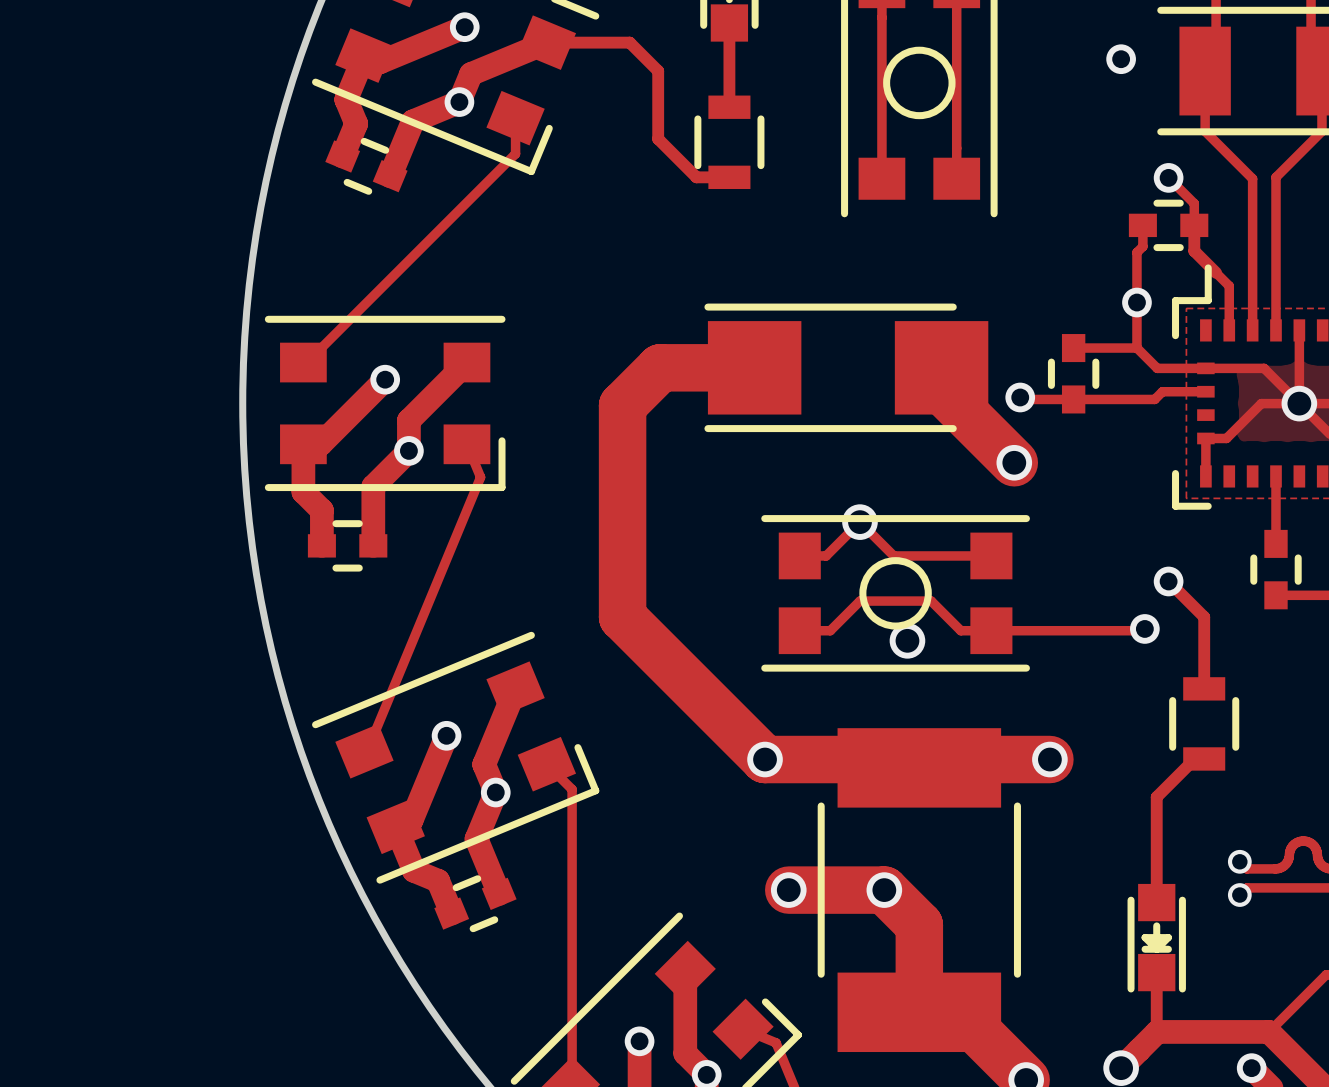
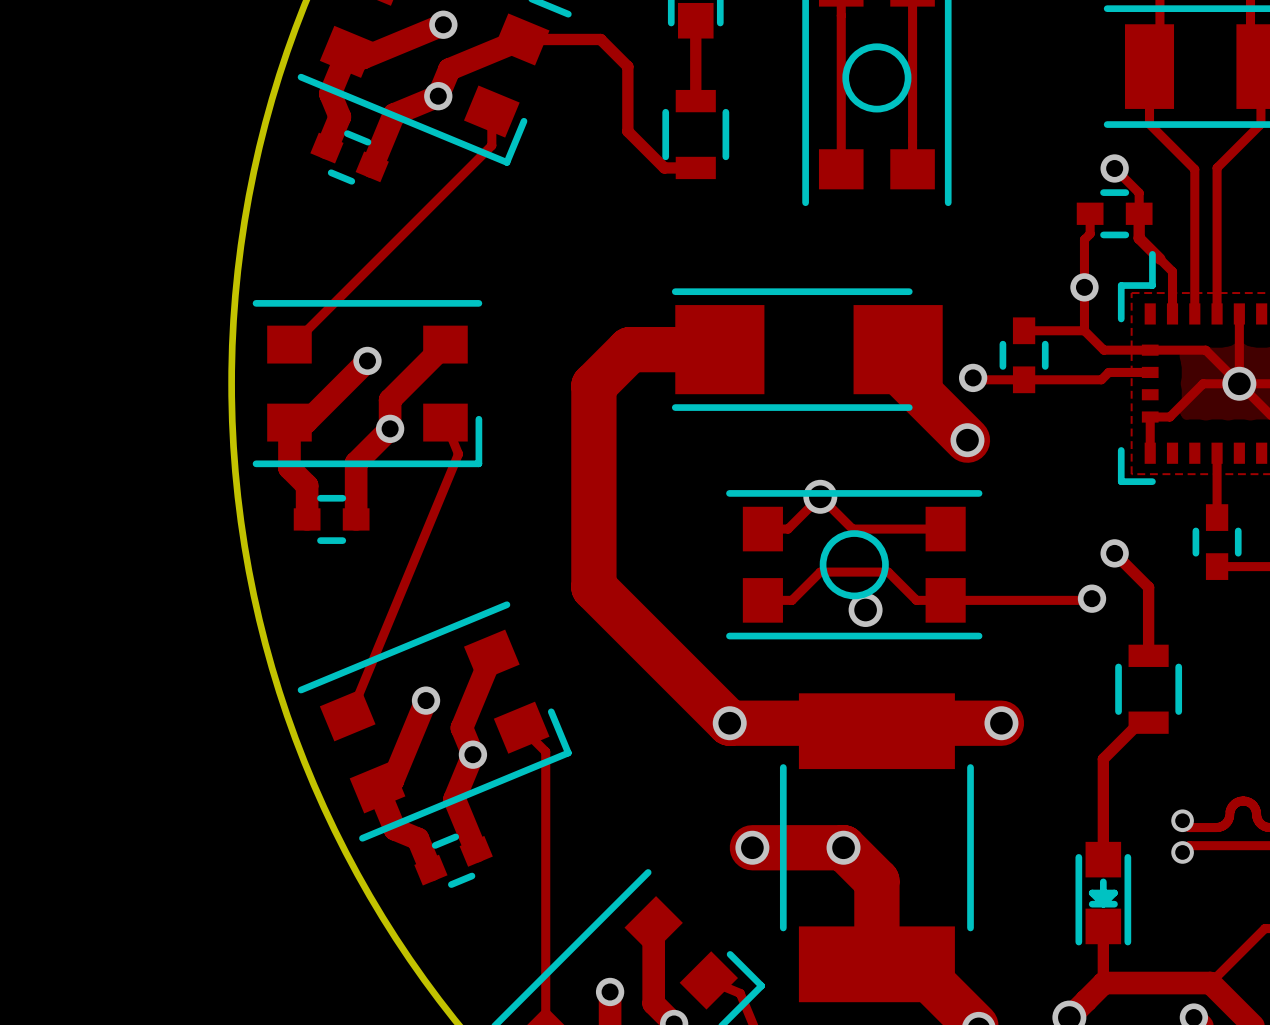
via: (1121, 59) -> none

